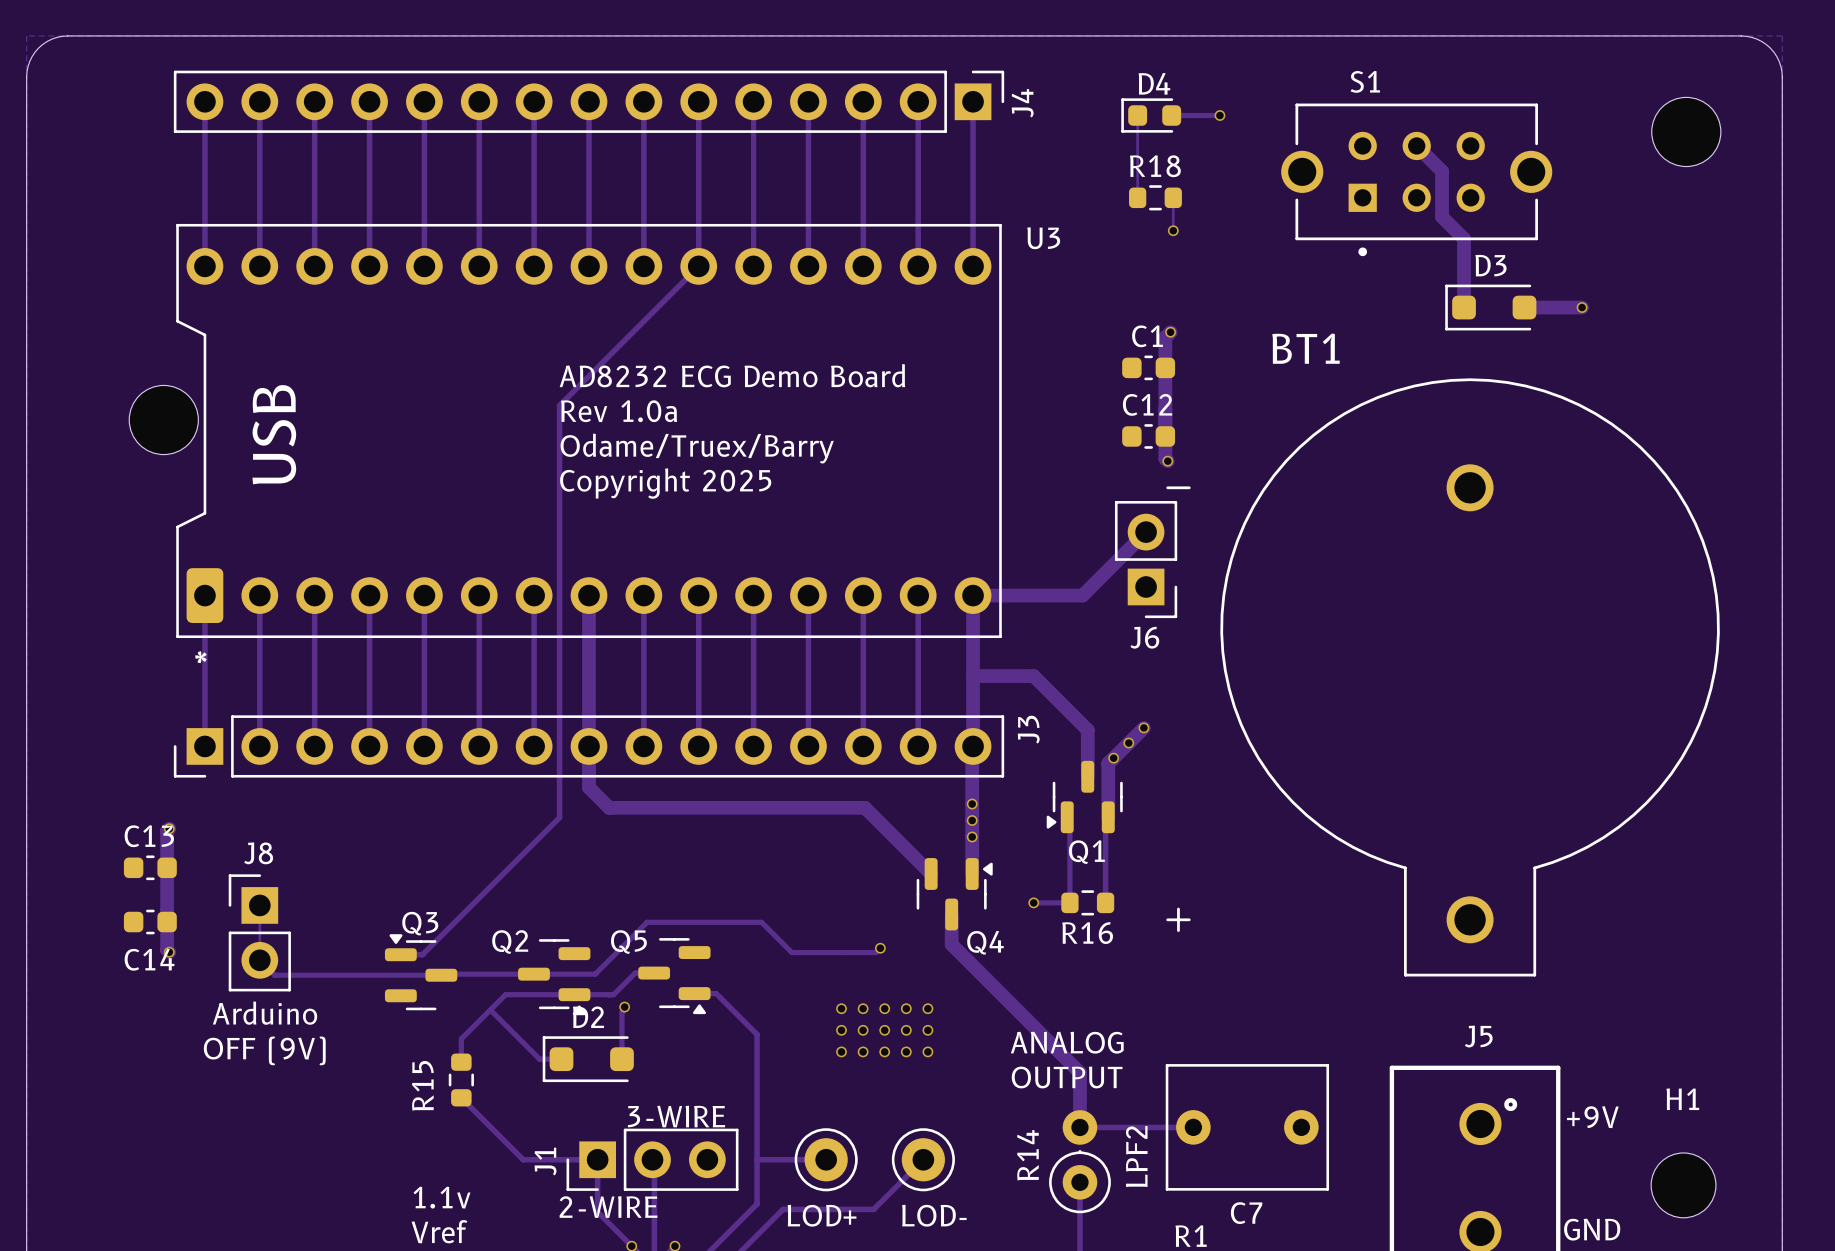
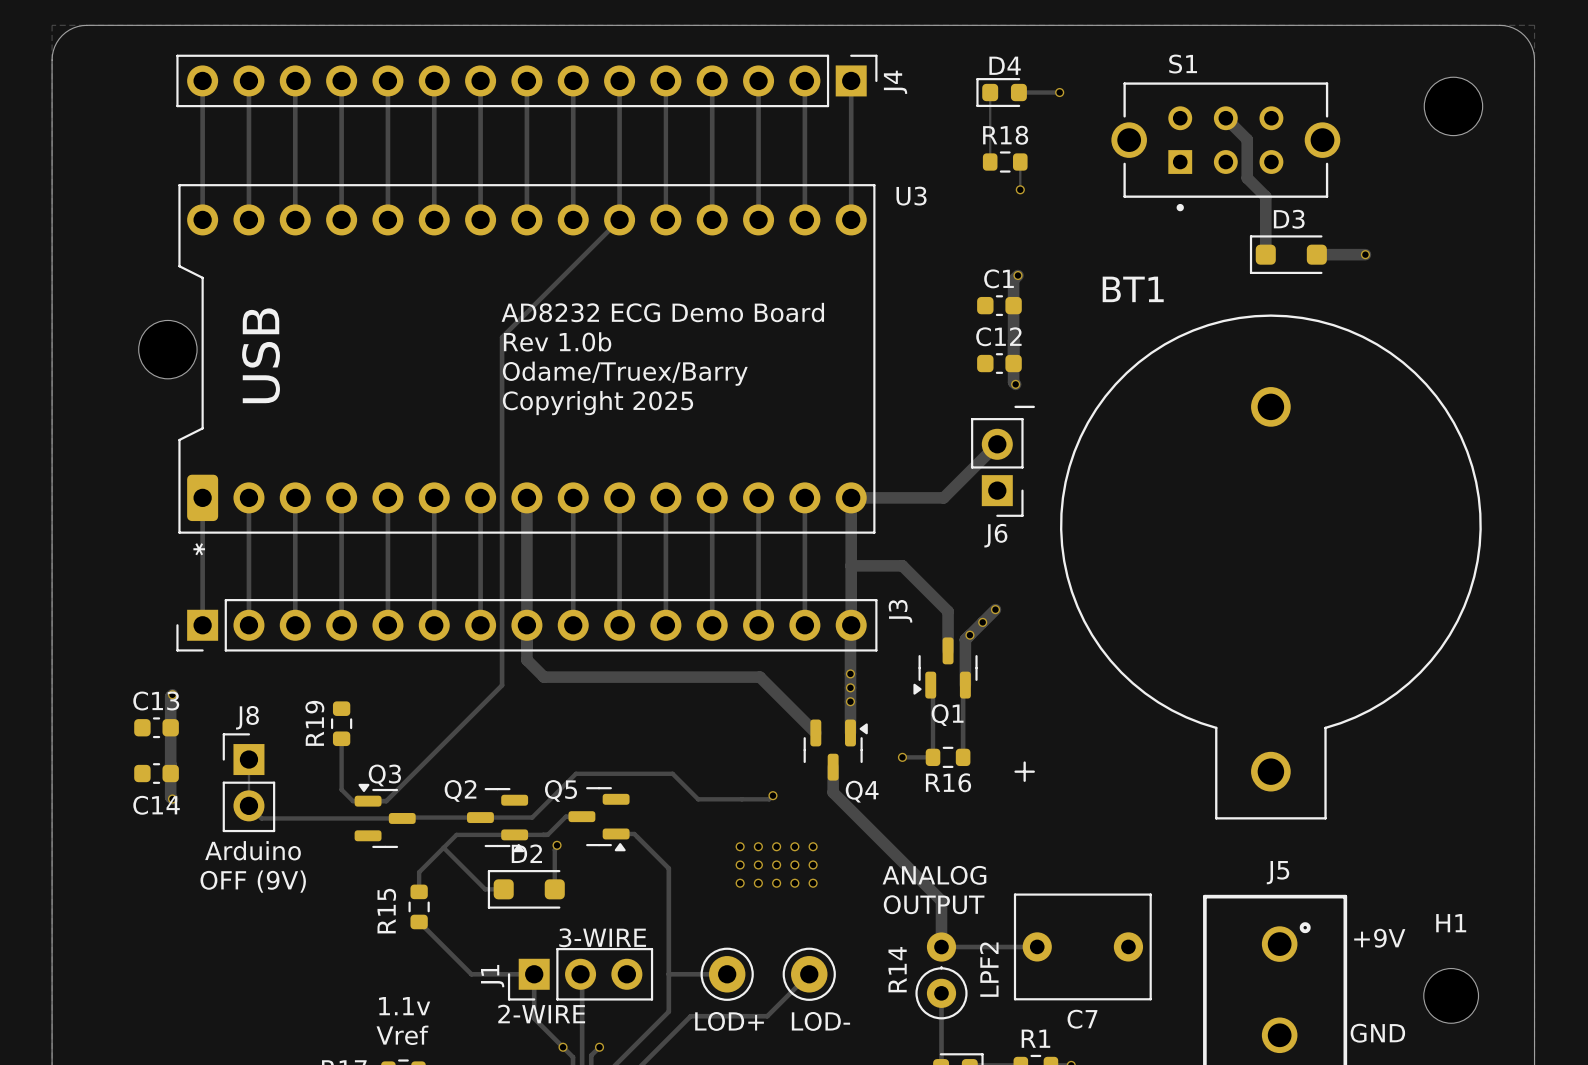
text: Rev 1.0a (619, 411) -> Rev 1.0b (557, 341)
R19: none -> (341, 723)
track: none -> (341, 738) (341, 789) (353, 801) (368, 801)

